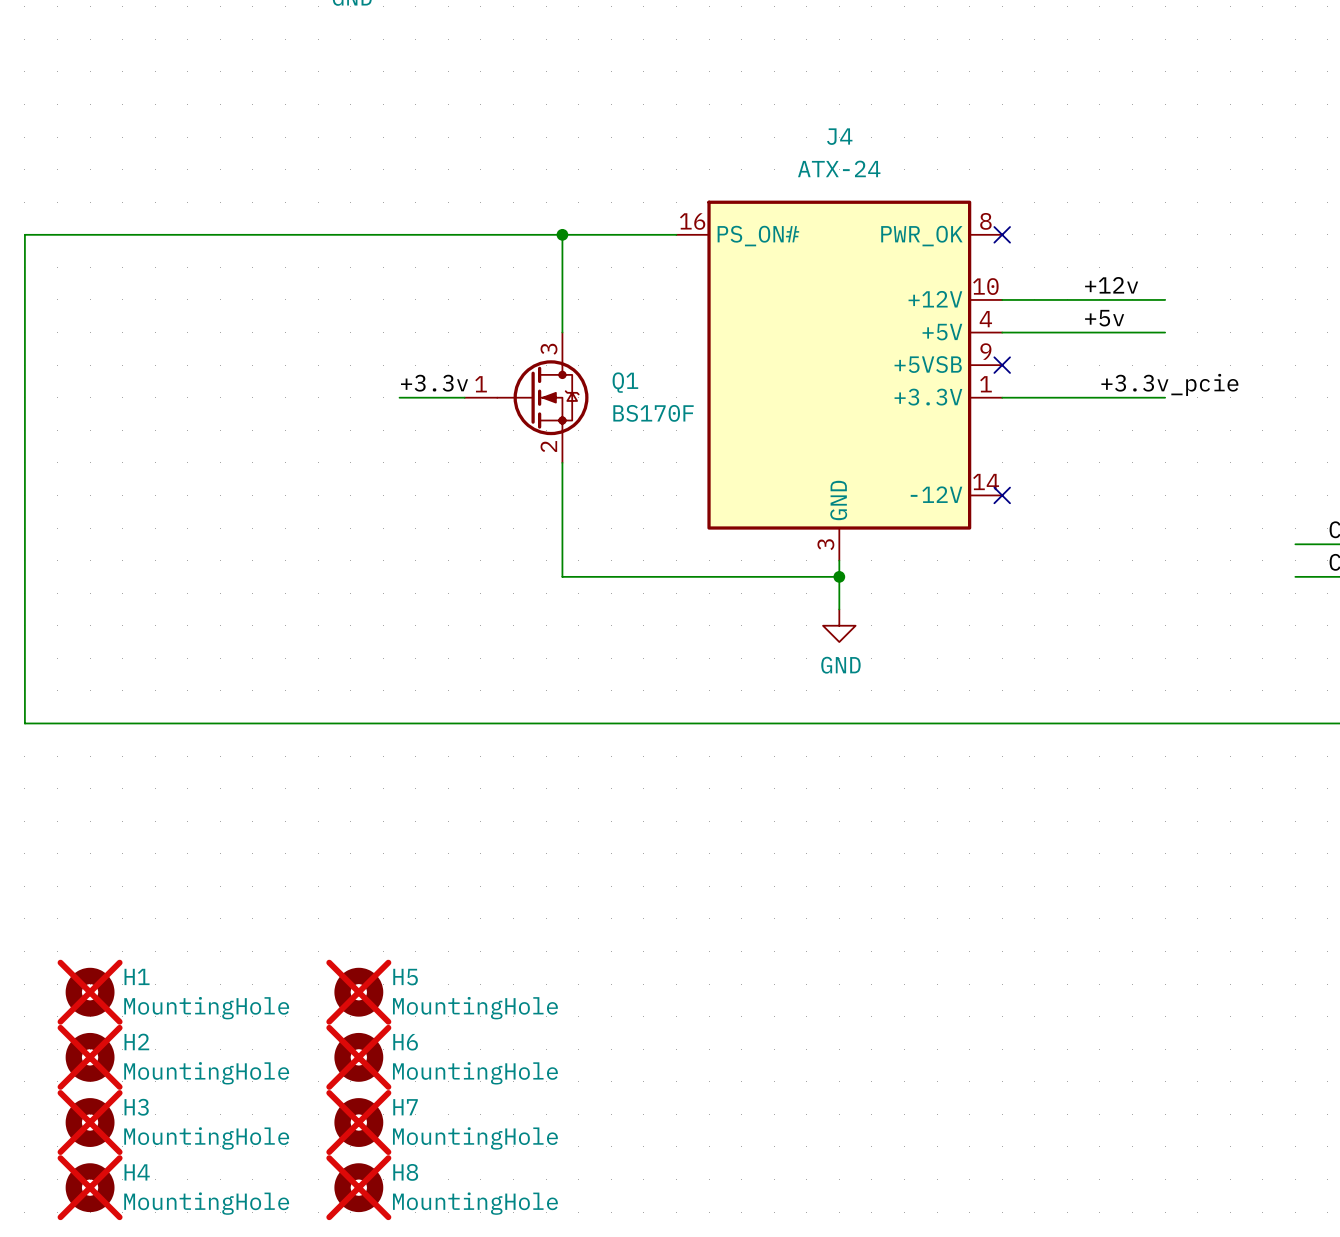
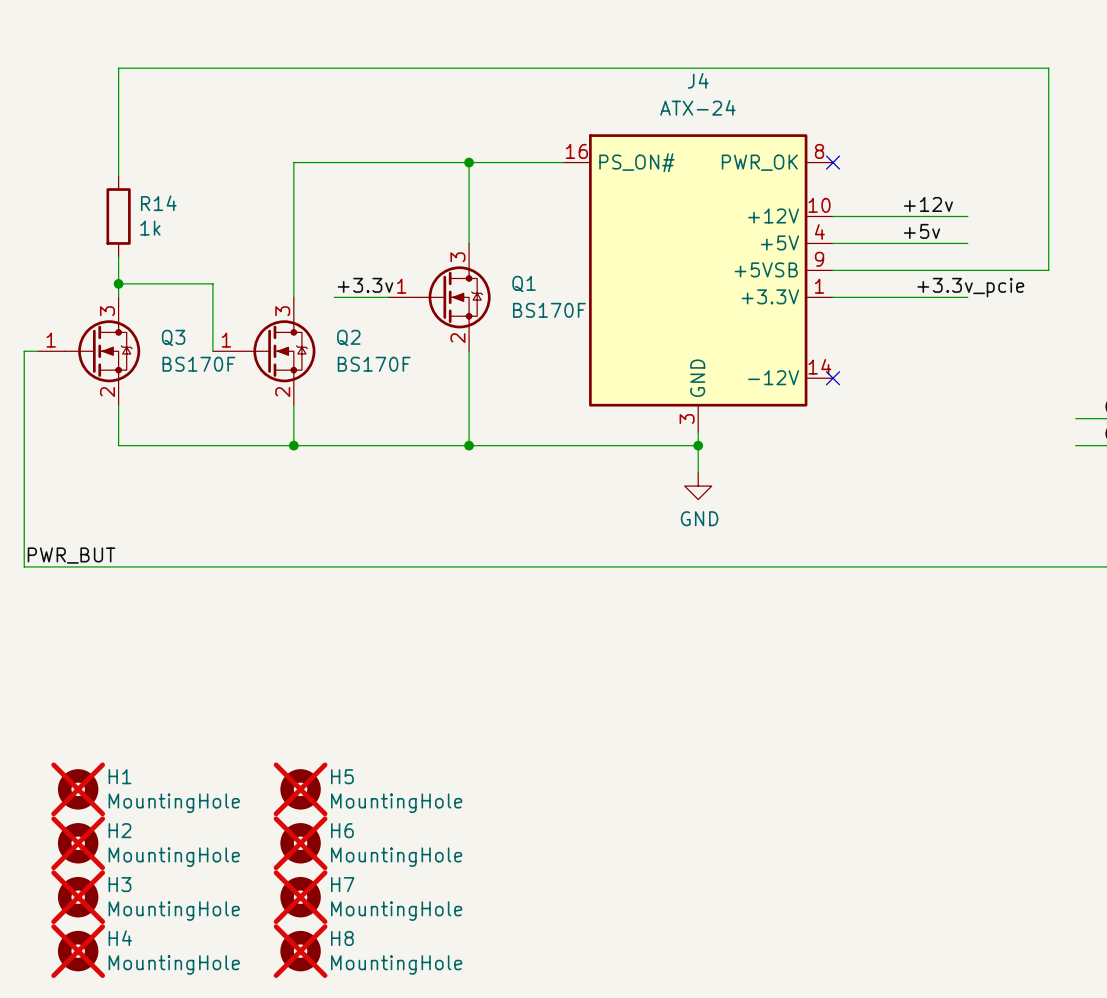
wire: (350, 234) (24, 234) (24, 462) -> (293, 162) (293, 297)
wire: none -> (118, 176) (118, 68) (1048, 68) (1048, 270) (833, 270)
R14: none -> 1k (118, 216)
wire: none -> (118, 256) (118, 297)
no-connect mark: (1002, 365) -> none
wire: none -> (118, 283) (212, 283) (212, 351)
junction: none -> (118, 283)
wire: none -> (24, 351) (37, 351)
Q3: none -> BS170F (88, 351)
Q2: none -> BS170F (264, 351)
wire: none -> (118, 405) (118, 445) (469, 445)
wire: none -> (293, 405) (293, 445)
junction: none -> (293, 445)
junction: none -> (469, 445)
label: none -> PWR_BUT (71, 555)

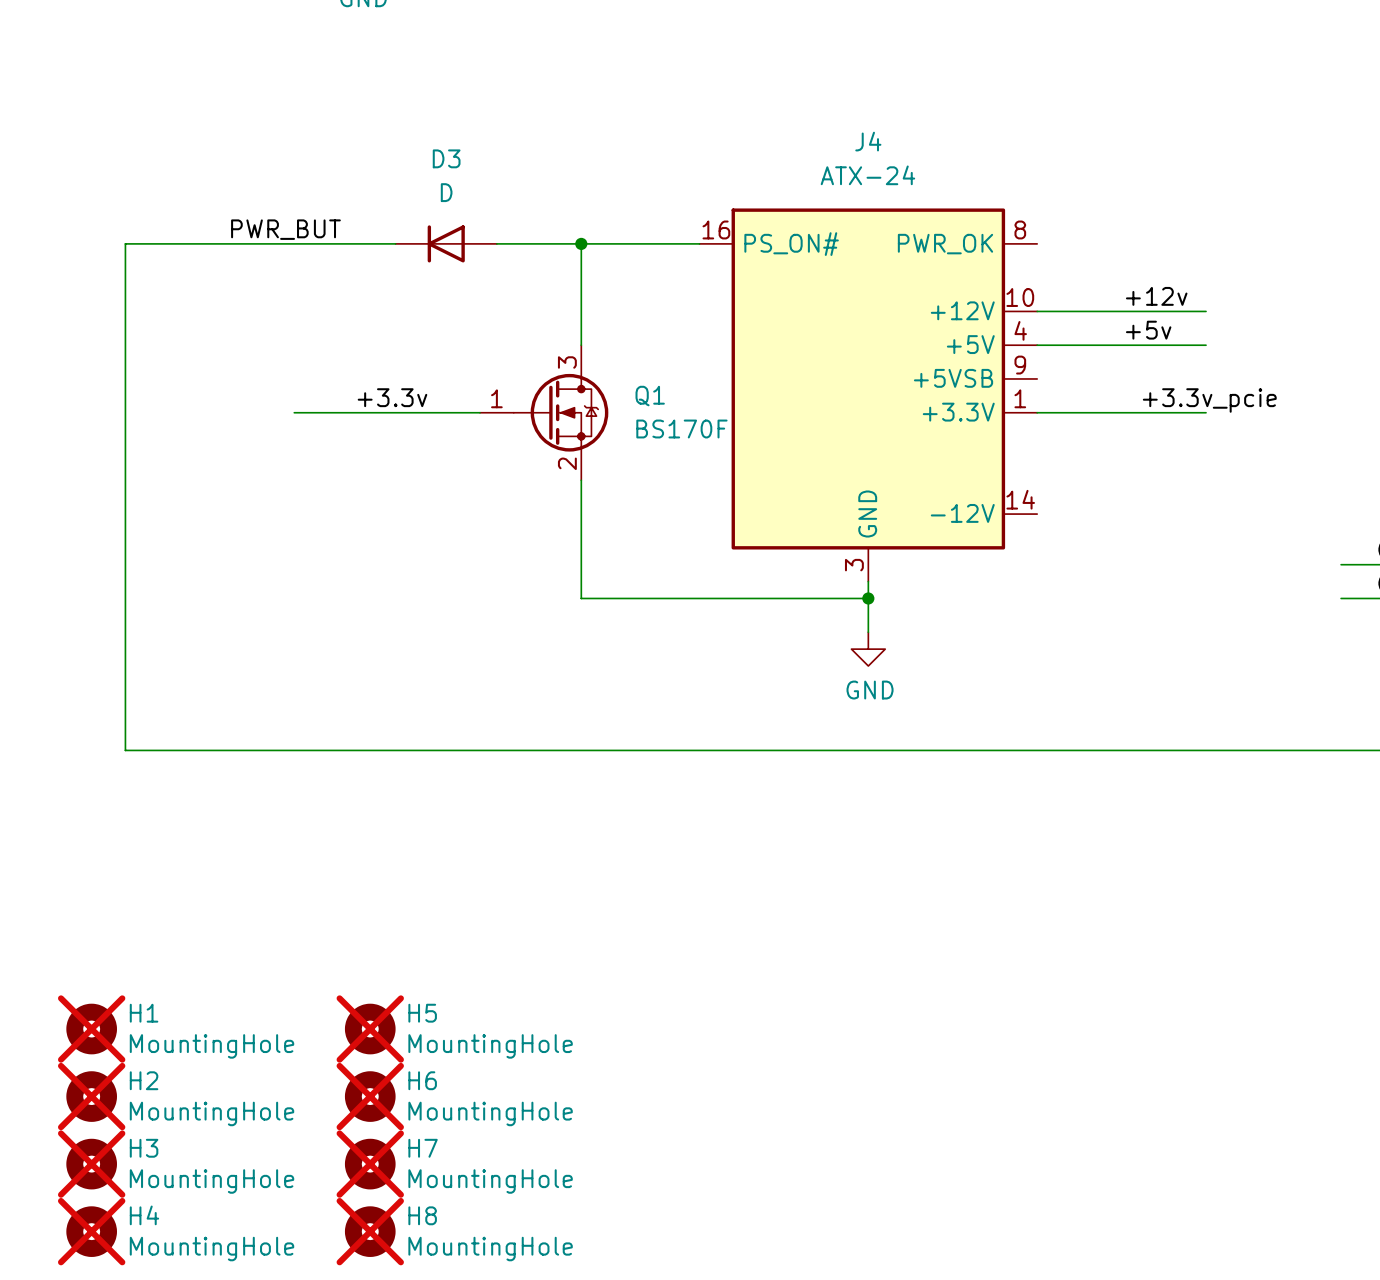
label: none -> PWR_BUT (285, 229)
wire: (293, 162) (293, 297) -> none
D3: none -> D (446, 243)
no-connect mark: (833, 162) -> none
wire: (118, 176) (118, 68) (1048, 68) (1048, 270) (833, 270) -> none
R14: 1k (118, 216) -> none
wire: (118, 256) (118, 297) -> none
wire: (118, 283) (212, 283) (212, 351) -> none
junction: (118, 283) -> none
label position: +3.3v (365, 285) -> +3.3v (392, 397)
wire: none -> (294, 412) (412, 412)
wire: (37, 351) (24, 351) (24, 566) (105, 566) -> (361, 243) (125, 243) (125, 750)
Q3: BS170F (88, 351) -> none
Q2: BS170F (264, 351) -> none
no-connect mark: (833, 378) -> none
wire: (118, 405) (118, 445) (469, 445) -> none
wire: (293, 405) (293, 445) -> none
junction: (293, 445) -> none
junction: (469, 445) -> none
label: PWR_BUT (71, 555) -> none

